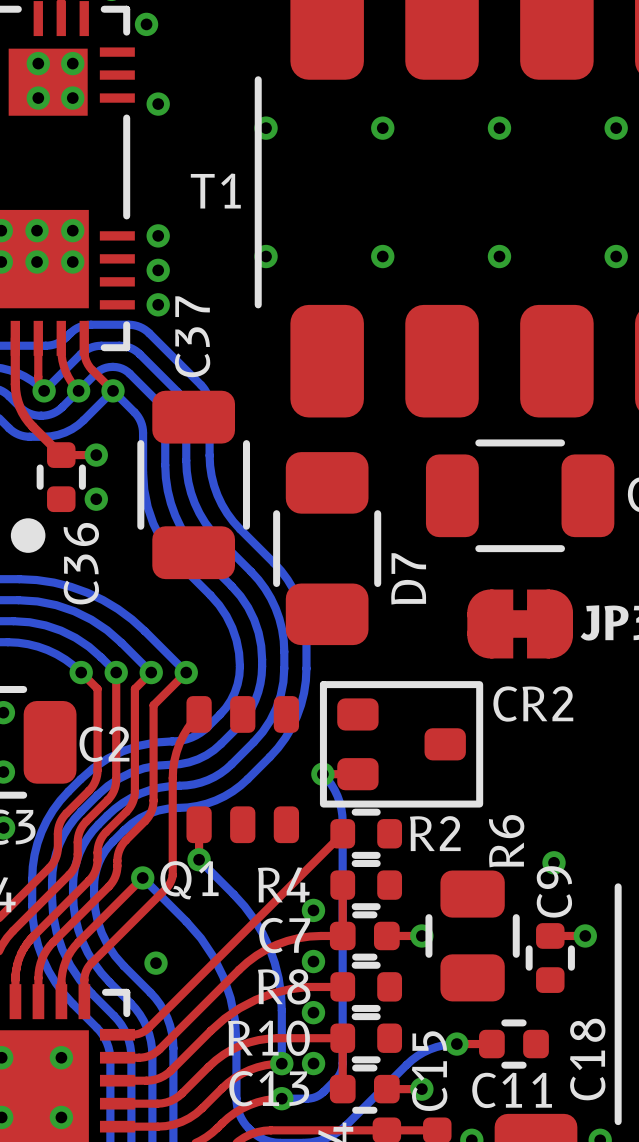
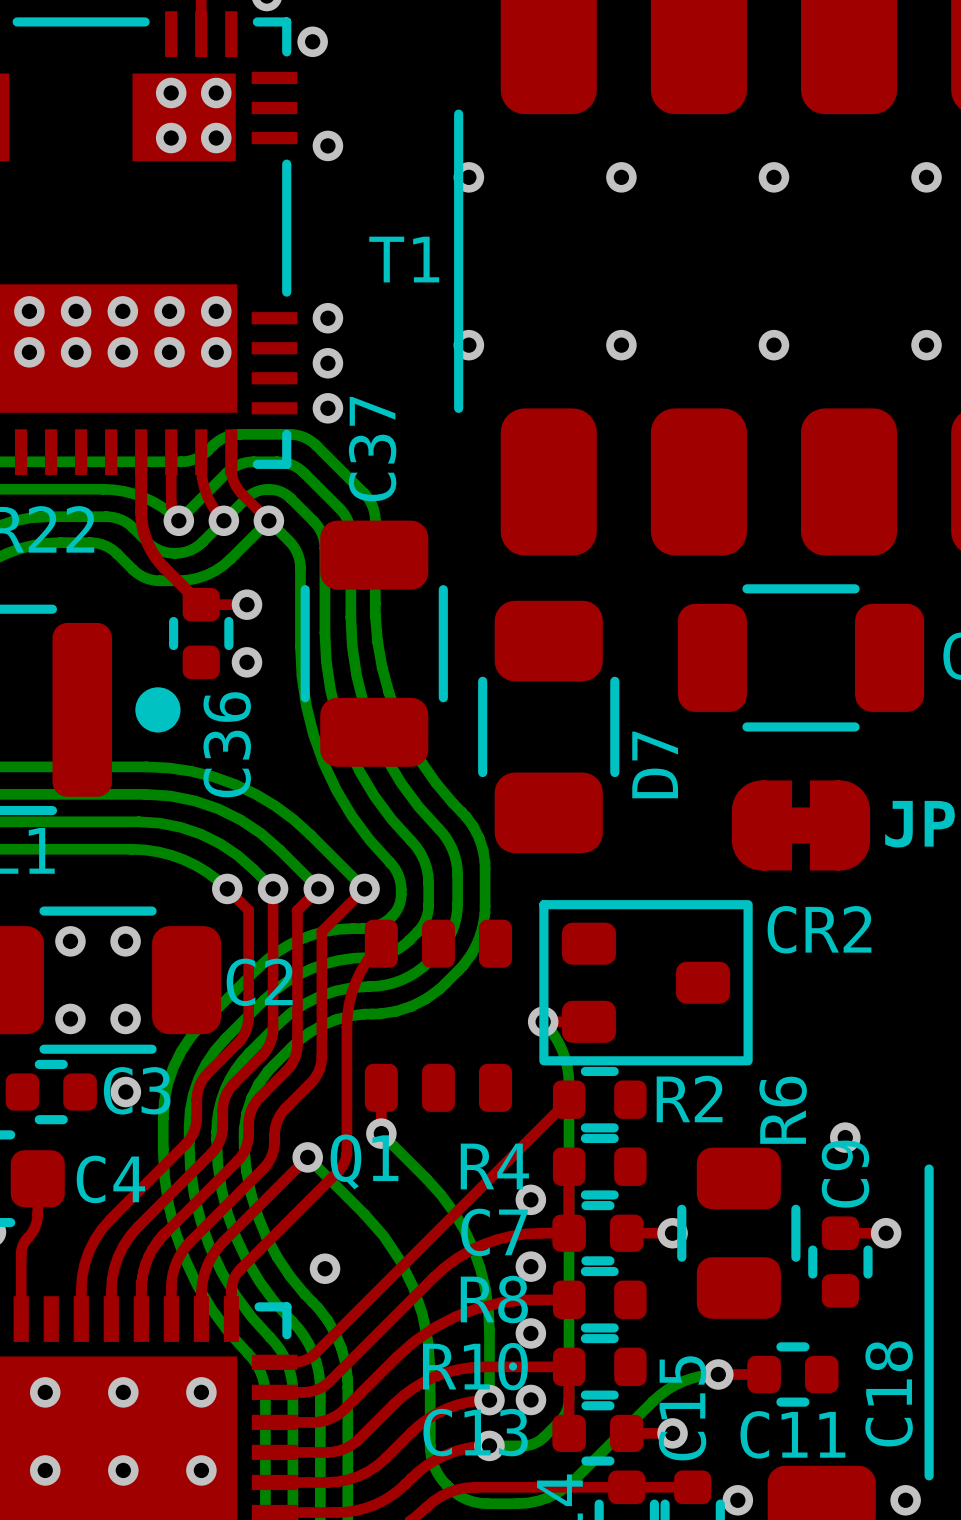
bottom track: (185, 369) (202, 387) (208, 397) (210, 465) (214, 485) (221, 504) (233, 521) (281, 570) (297, 599) (305, 630) (306, 668) (304, 692) (291, 727) (278, 747) (247, 779) (232, 791) (215, 800) (197, 806) (158, 810) (140, 818) (124, 830) (108, 846) (96, 868) (94, 887) (94, 907) (101, 933) (115, 956) (155, 998) (164, 1011) (171, 1032) (173, 1053) -> (364, 493) (372, 505) (375, 516) (375, 616) (382, 667) (388, 692) (397, 716) (421, 762) (436, 783) (466, 816) (479, 838) (484, 862) (484, 913) (478, 941) (471, 953) (463, 965) (439, 989) (411, 1006) (380, 1013) (349, 1016) (321, 1025) (308, 1033) (268, 1070) (251, 1098) (246, 1113) (244, 1136) (246, 1171) (257, 1215) (277, 1257) (289, 1276) (327, 1320) (335, 1333) (345, 1363) (347, 1387)
bottom track: (167, 381) (181, 396) (185, 407) (186, 471) (194, 503) (211, 531) (258, 579) (270, 598) (282, 629) (284, 668) (280, 695) (270, 720) (253, 742) (226, 769) (201, 782) (159, 787) (131, 797) (114, 809) (98, 824) (87, 837) (79, 852) (74, 869) (73, 886) (73, 906) (78, 930) (94, 963) (130, 1003) -> (339, 508) (346, 517) (350, 531) (352, 646) (363, 703) (386, 758) (401, 783) (418, 806) (442, 833) (452, 849) (457, 868) (457, 910) (454, 924) (445, 943) (422, 967) (409, 976) (393, 982) (335, 990) (304, 1003) (278, 1024) (249, 1052) (235, 1069) (225, 1089) (218, 1110) (216, 1139) (221, 1189) (227, 1214) (236, 1237) (259, 1282) (291, 1321)
bottom track: (147, 391) (160, 405) (164, 415) (165, 478) (175, 515) (195, 548) (231, 586) (248, 607) (258, 632) (261, 646) (261, 674) (258, 691) (247, 715) (214, 750) (189, 762) (143, 768) (119, 778) (107, 786) (81, 811) (68, 826) (59, 843) (53, 862) (52, 881) (53, 915) (56, 932) (62, 949) (80, 980) (114, 1015) -> (313, 521) (322, 533) (324, 544) (326, 661) (337, 718) (359, 771) (374, 796) (391, 819) (416, 846) (424, 860) (428, 875) (428, 908) (425, 919) (420, 929) (395, 950) (379, 956) (353, 958) (324, 963) (285, 982) (263, 1000) (225, 1038) (205, 1064) (198, 1078) (190, 1110) (189, 1141) (194, 1195) (201, 1222) (210, 1247) (235, 1295) (270, 1337)
bottom track: (128, 406) (138, 416) (142, 427) (144, 489) (153, 523) (170, 553) (210, 595) (226, 616) (236, 640) (239, 666) -> none
bottom track: (239, 666) (237, 684) (230, 700) (204, 729) (186, 739) (138, 745) (107, 758) (80, 779) (60, 800) (41, 831) (34, 854) (32, 879) (32, 919) (38, 945) (55, 982) (97, 1027) -> (289, 541) (295, 550) (300, 564) (301, 676) (313, 735) (323, 763) (351, 816) (396, 871) (400, 882) (401, 897) (394, 913) (378, 925) (366, 928) (340, 929) (314, 934) (289, 944) (267, 959) (191, 1036) (181, 1051) (167, 1083) (163, 1118) (164, 1177) (175, 1232) (197, 1285) (211, 1309) (247, 1353)

